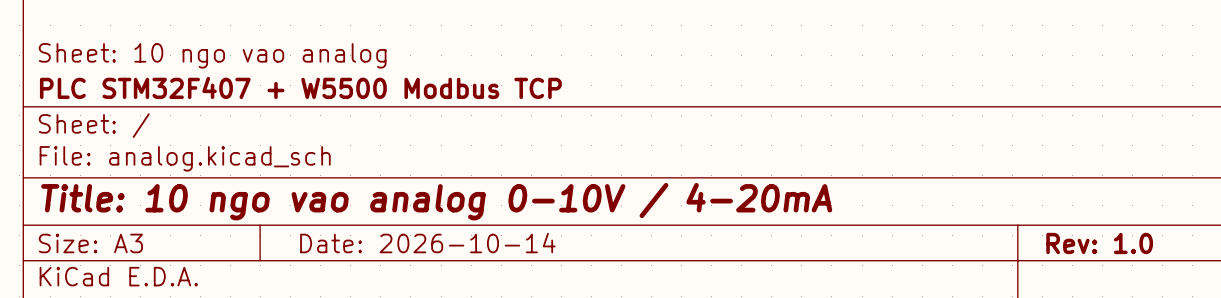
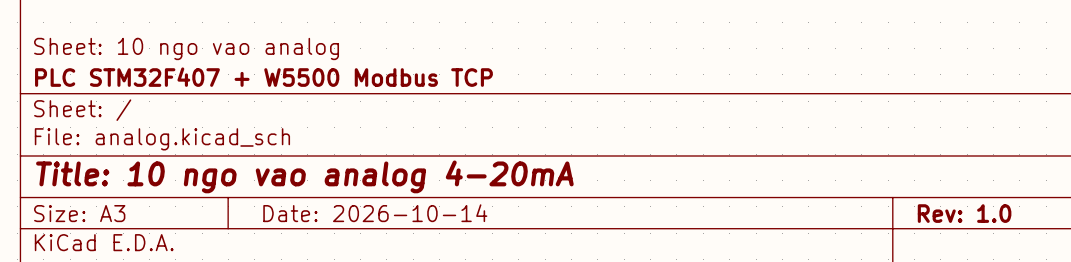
title block: Title: 10 ngo vao analog 0-10V / 4-20mA (436, 201) -> Title: 10 ngo vao analog 4-20mA (304, 176)

